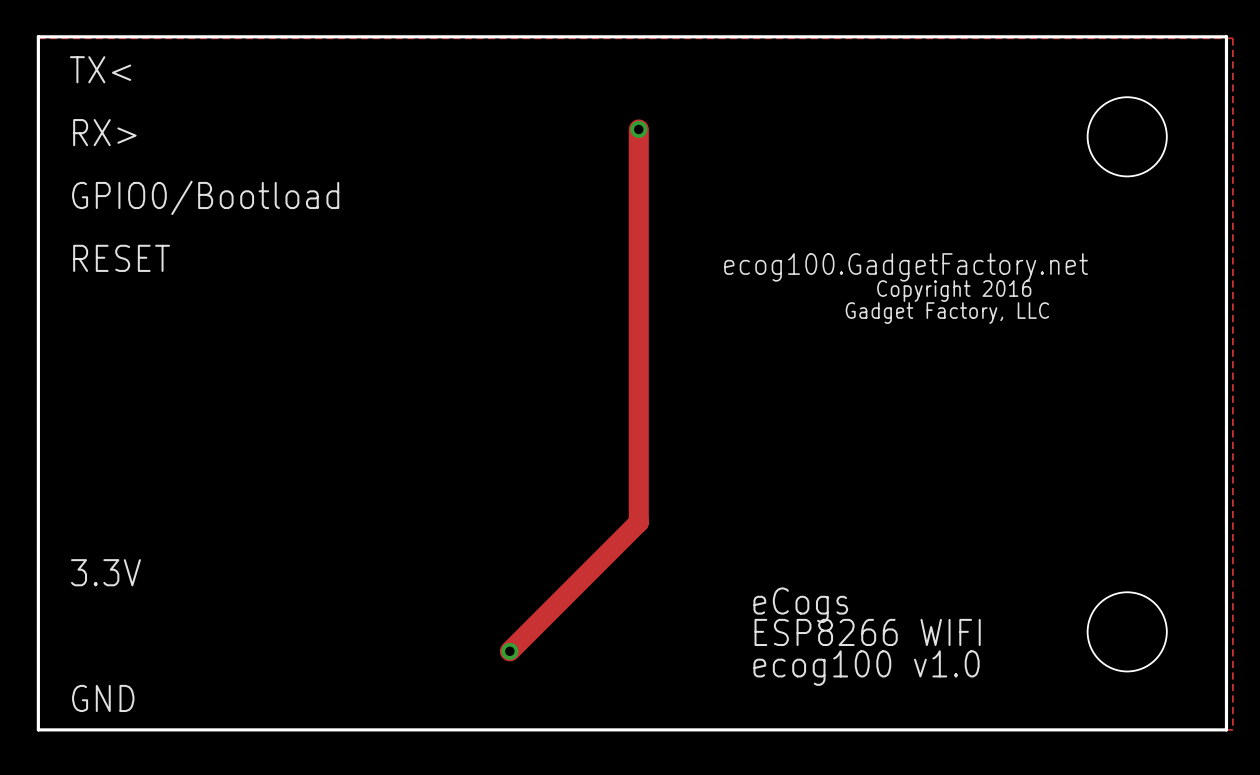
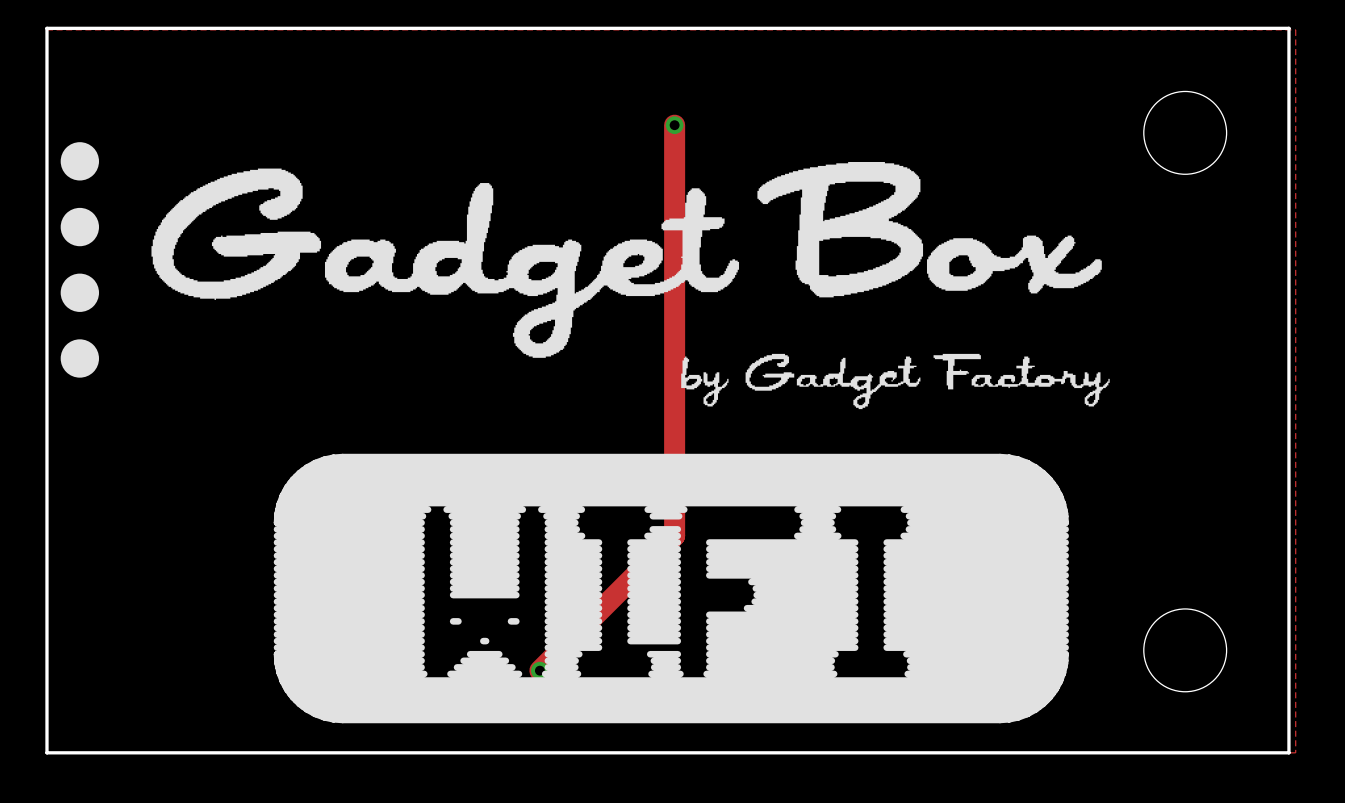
text: TX< (100, 69) -> none
text: RX> (104, 132) -> none
drawing: none -> [60, 142, 100, 378]
drawing: none -> [151, 161, 1110, 410]
text: GPIO0/Bootload (205, 197) -> none
text: RESET (121, 258) -> none
text: ecog100.GadgetFactory.net (906, 267) -> none
text: Copyright 2016 (954, 291) -> none
text: Gadget Factory, LLC (947, 313) -> none
line: none -> (314, 463) (1028, 463)
line: none -> (303, 470) (1039, 470)
line: none -> (296, 476) (1046, 476)
line: none -> (290, 483) (1052, 483)
line: none -> (285, 489) (1056, 489)
line: none -> (282, 496) (1060, 496)
line: none -> (280, 503) (1062, 503)
line: none -> (278, 509) (428, 509)
line: none -> (446, 509) (522, 509)
line: none -> (541, 509) (581, 509)
line: none -> (647, 509) (684, 509)
line: none -> (797, 509) (837, 509)
line: none -> (903, 509) (1064, 509)
line: none -> (277, 516) (422, 516)
line: none -> (451, 516) (517, 516)
line: none -> (546, 516) (576, 516)
line: none -> (652, 516) (679, 516)
line: none -> (802, 516) (832, 516)
line: none -> (909, 516) (1065, 516)
line: none -> (421, 522) (277, 522) (282, 495) (293, 479) (315, 463) (342, 457) (1009, 457) (1027, 463) (1049, 479) (1059, 495) (1065, 522) (910, 522)
line: none -> (453, 522) (516, 522)
line: none -> (547, 522) (575, 522)
line: none -> (804, 522) (831, 522)
line: none -> (277, 529) (421, 529)
line: none -> (453, 529) (516, 529)
line: none -> (547, 529) (576, 529)
line: none -> (652, 529) (677, 529)
line: none -> (802, 529) (832, 529)
line: none -> (908, 529) (1065, 529)
line: none -> (277, 535) (421, 535)
line: none -> (453, 535) (516, 535)
line: none -> (547, 535) (582, 535)
line: none -> (647, 535) (677, 535)
line: none -> (797, 535) (838, 535)
line: none -> (903, 535) (1065, 535)
line: none -> (277, 542) (421, 542)
line: none -> (453, 542) (516, 542)
line: none -> (547, 542) (598, 542)
line: none -> (630, 542) (677, 542)
line: none -> (709, 542) (855, 542)
line: none -> (886, 542) (1065, 542)
line: none -> (277, 549) (421, 549)
line: none -> (453, 549) (516, 549)
line: none -> (547, 549) (598, 549)
line: none -> (630, 549) (677, 549)
line: none -> (709, 549) (855, 549)
line: none -> (886, 549) (1065, 549)
line: none -> (277, 555) (421, 555)
line: none -> (453, 555) (516, 555)
line: none -> (547, 555) (598, 555)
line: none -> (630, 555) (677, 555)
line: none -> (709, 555) (855, 555)
line: none -> (886, 555) (1065, 555)
line: none -> (277, 562) (421, 562)
line: none -> (453, 562) (516, 562)
line: none -> (547, 562) (598, 562)
line: none -> (630, 562) (677, 562)
line: none -> (709, 562) (855, 562)
line: none -> (886, 562) (1065, 562)
line: none -> (277, 568) (421, 568)
line: none -> (453, 568) (516, 568)
line: none -> (547, 568) (598, 568)
line: none -> (630, 568) (677, 568)
line: none -> (709, 568) (855, 568)
line: none -> (886, 568) (1065, 568)
line: none -> (277, 575) (421, 575)
line: none -> (453, 575) (516, 575)
line: none -> (547, 575) (598, 575)
line: none -> (630, 575) (677, 575)
line: none -> (709, 575) (855, 575)
line: none -> (886, 575) (1065, 575)
line: none -> (277, 581) (421, 581)
line: none -> (453, 581) (516, 581)
line: none -> (547, 581) (598, 581)
line: none -> (630, 581) (677, 581)
line: none -> (751, 581) (855, 581)
line: none -> (886, 581) (1065, 581)
text: 3.3V (105, 572) -> none
line: none -> (277, 588) (421, 588)
line: none -> (453, 588) (516, 588)
line: none -> (547, 588) (598, 588)
line: none -> (630, 588) (677, 588)
line: none -> (755, 588) (855, 588)
line: none -> (886, 588) (1065, 588)
line: none -> (277, 595) (421, 595)
line: none -> (453, 595) (516, 595)
line: none -> (547, 595) (598, 595)
line: none -> (630, 595) (677, 595)
line: none -> (756, 595) (855, 595)
line: none -> (886, 595) (1065, 595)
line: none -> (277, 601) (421, 601)
line: none -> (547, 601) (598, 601)
line: none -> (630, 601) (677, 601)
line: none -> (754, 601) (855, 601)
line: none -> (886, 601) (1065, 601)
line: none -> (277, 608) (421, 608)
line: none -> (547, 608) (598, 608)
line: none -> (630, 608) (677, 608)
line: none -> (747, 608) (855, 608)
line: none -> (886, 608) (1065, 608)
line: none -> (277, 614) (421, 614)
line: none -> (547, 614) (598, 614)
line: none -> (630, 614) (677, 614)
line: none -> (709, 614) (855, 614)
line: none -> (886, 614) (1065, 614)
line: none -> (277, 621) (421, 621)
line: none -> (453, 621) (458, 621)
line: none -> (511, 621) (516, 621)
line: none -> (547, 621) (598, 621)
line: none -> (630, 621) (677, 621)
line: none -> (709, 621) (855, 621)
line: none -> (886, 621) (1065, 621)
text: eCogs (800, 605) -> none
line: none -> (277, 627) (421, 627)
line: none -> (547, 627) (598, 627)
line: none -> (630, 627) (677, 627)
line: none -> (709, 627) (855, 627)
line: none -> (886, 627) (1065, 627)
line: none -> (277, 634) (421, 634)
line: none -> (547, 634) (598, 634)
line: none -> (630, 634) (677, 634)
line: none -> (709, 634) (855, 634)
line: none -> (886, 634) (1065, 634)
line: none -> (277, 641) (421, 641)
line: none -> (483, 641) (486, 641)
line: none -> (547, 641) (598, 641)
line: none -> (630, 641) (677, 641)
line: none -> (709, 641) (855, 641)
line: none -> (886, 641) (1065, 641)
line: none -> (277, 647) (421, 647)
line: none -> (547, 647) (598, 647)
line: none -> (709, 647) (855, 647)
line: none -> (886, 647) (1065, 647)
text: ESP8266 WIFI (867, 632) -> none
line: none -> (421, 654) (277, 654) (282, 681) (299, 703) (315, 714) (342, 719) (1009, 719) (1027, 714) (1049, 697) (1059, 681) (1065, 654) (906, 654)
line: none -> (470, 654) (499, 654)
line: none -> (547, 654) (579, 654)
line: none -> (650, 654) (677, 654)
line: none -> (709, 654) (835, 654)
line: none -> (277, 660) (421, 660)
line: none -> (463, 660) (505, 660)
line: none -> (547, 660) (575, 660)
line: none -> (653, 660) (677, 660)
line: none -> (709, 660) (831, 660)
line: none -> (910, 660) (1065, 660)
line: none -> (278, 667) (421, 667)
line: none -> (457, 667) (512, 667)
line: none -> (547, 667) (575, 667)
line: none -> (654, 667) (677, 667)
line: none -> (709, 667) (831, 667)
line: none -> (910, 667) (1064, 667)
line: none -> (280, 673) (424, 673)
line: none -> (450, 673) (518, 673)
line: none -> (545, 673) (577, 673)
line: none -> (651, 673) (680, 673)
line: none -> (706, 673) (834, 673)
line: none -> (907, 673) (1062, 673)
line: none -> (282, 680) (1060, 680)
line: none -> (285, 687) (1056, 687)
text: ecog100 v1.0 (866, 668) -> none
line: none -> (290, 693) (1052, 693)
line: none -> (296, 700) (1046, 700)
line: none -> (303, 706) (1039, 706)
line: none -> (314, 713) (1028, 713)
text: GND (103, 698) -> none

